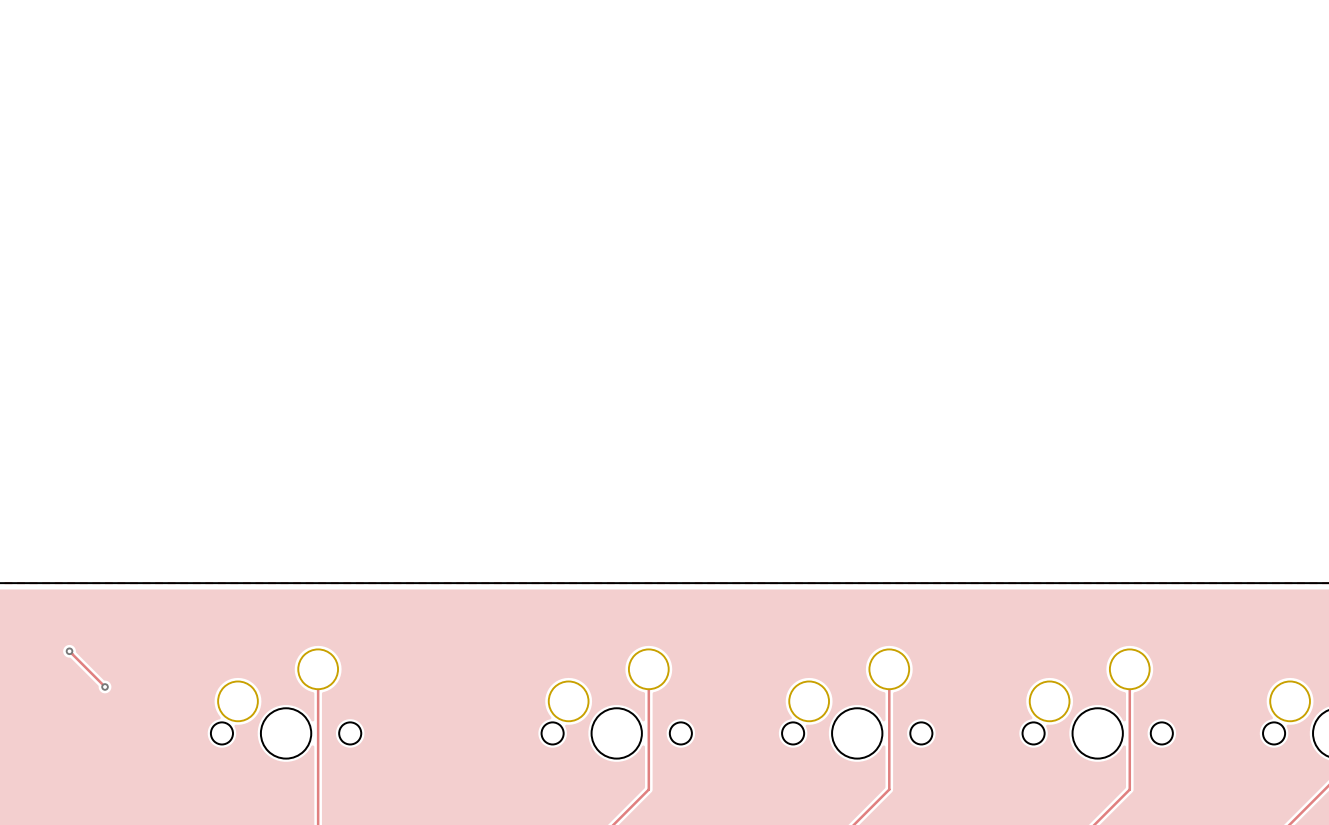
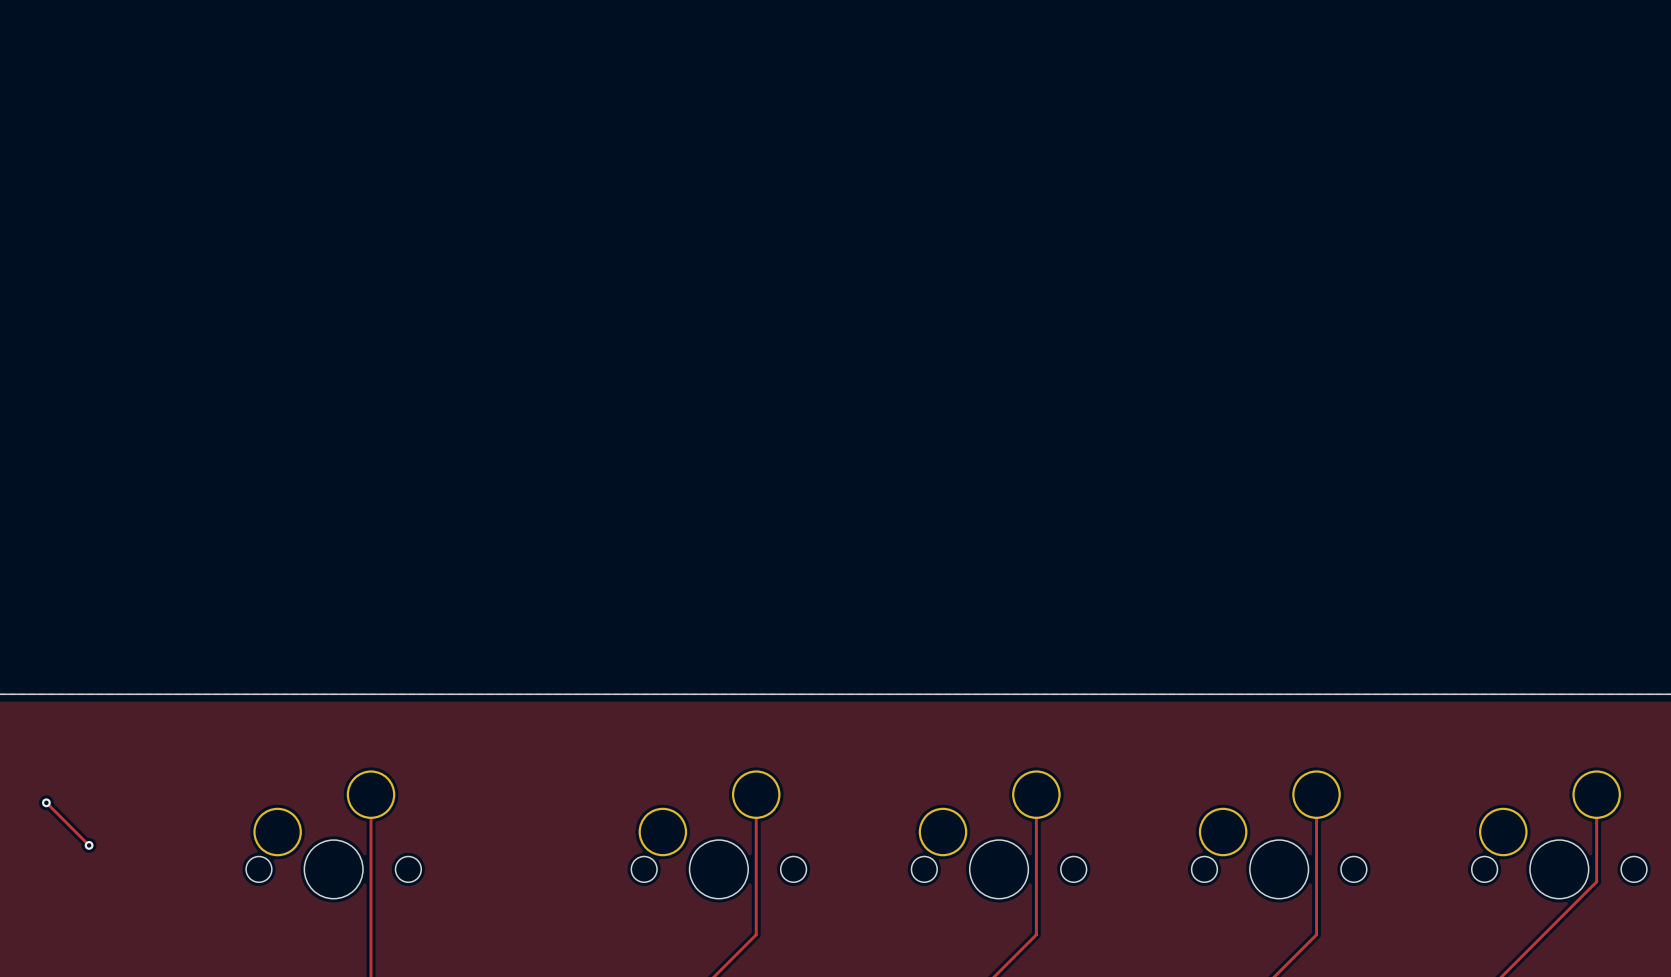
via: (69, 651) -> none
track: (72, 653) (105, 686) -> none
track: none -> (46, 802) (89, 845)
via: none -> (46, 802)
via: (105, 686) -> none
via: none -> (89, 845)

